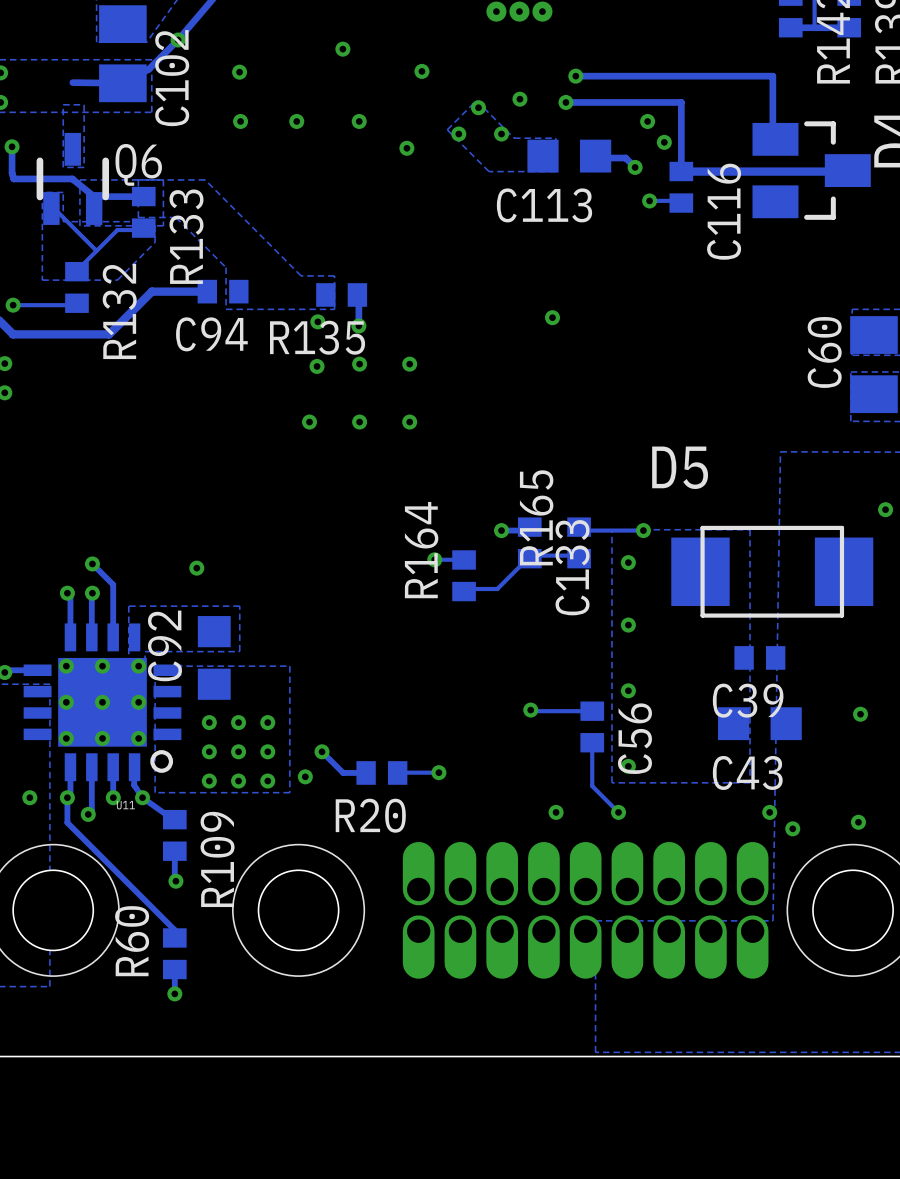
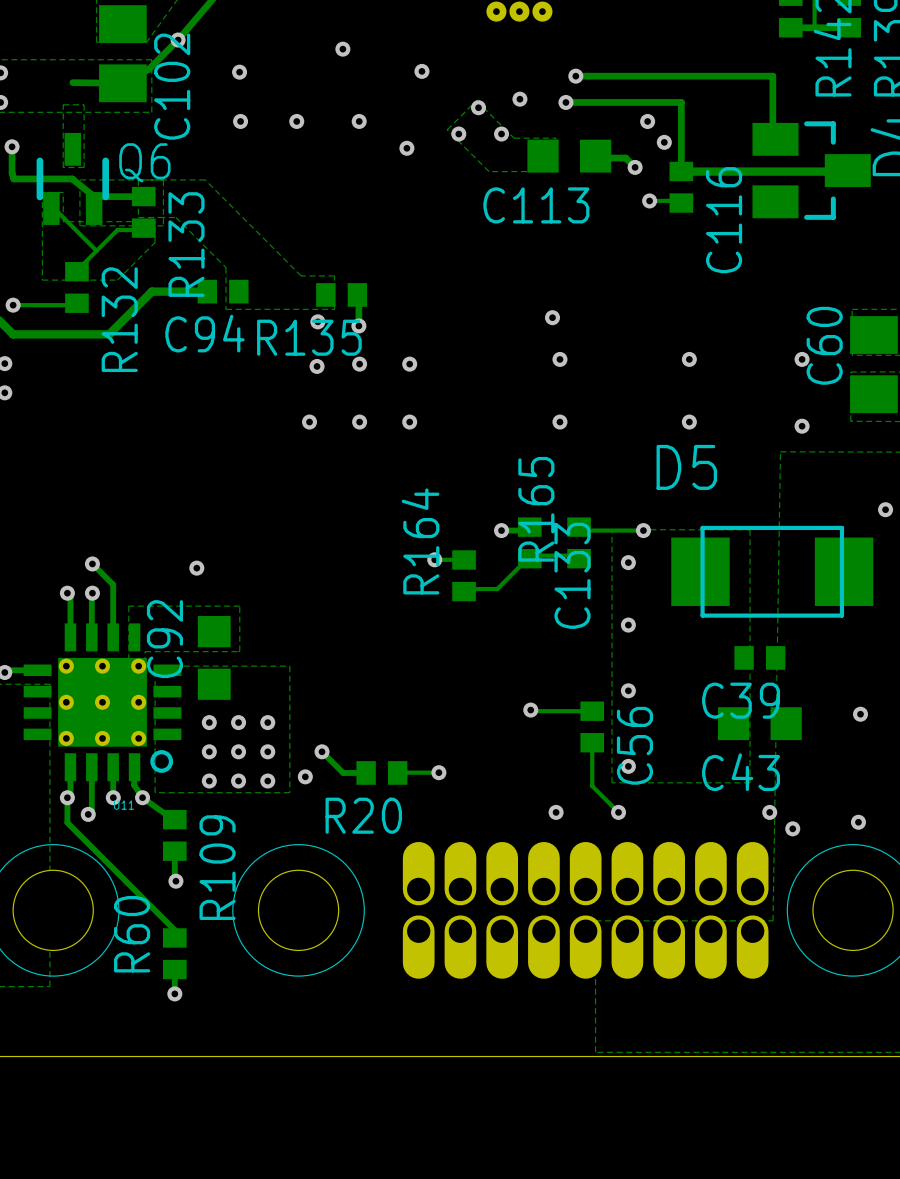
via: none -> (559, 359)
via: none -> (689, 359)
via: none -> (802, 359)
via: none -> (559, 422)
via: none -> (689, 422)
via: none -> (802, 426)
via: (29, 797) -> none

